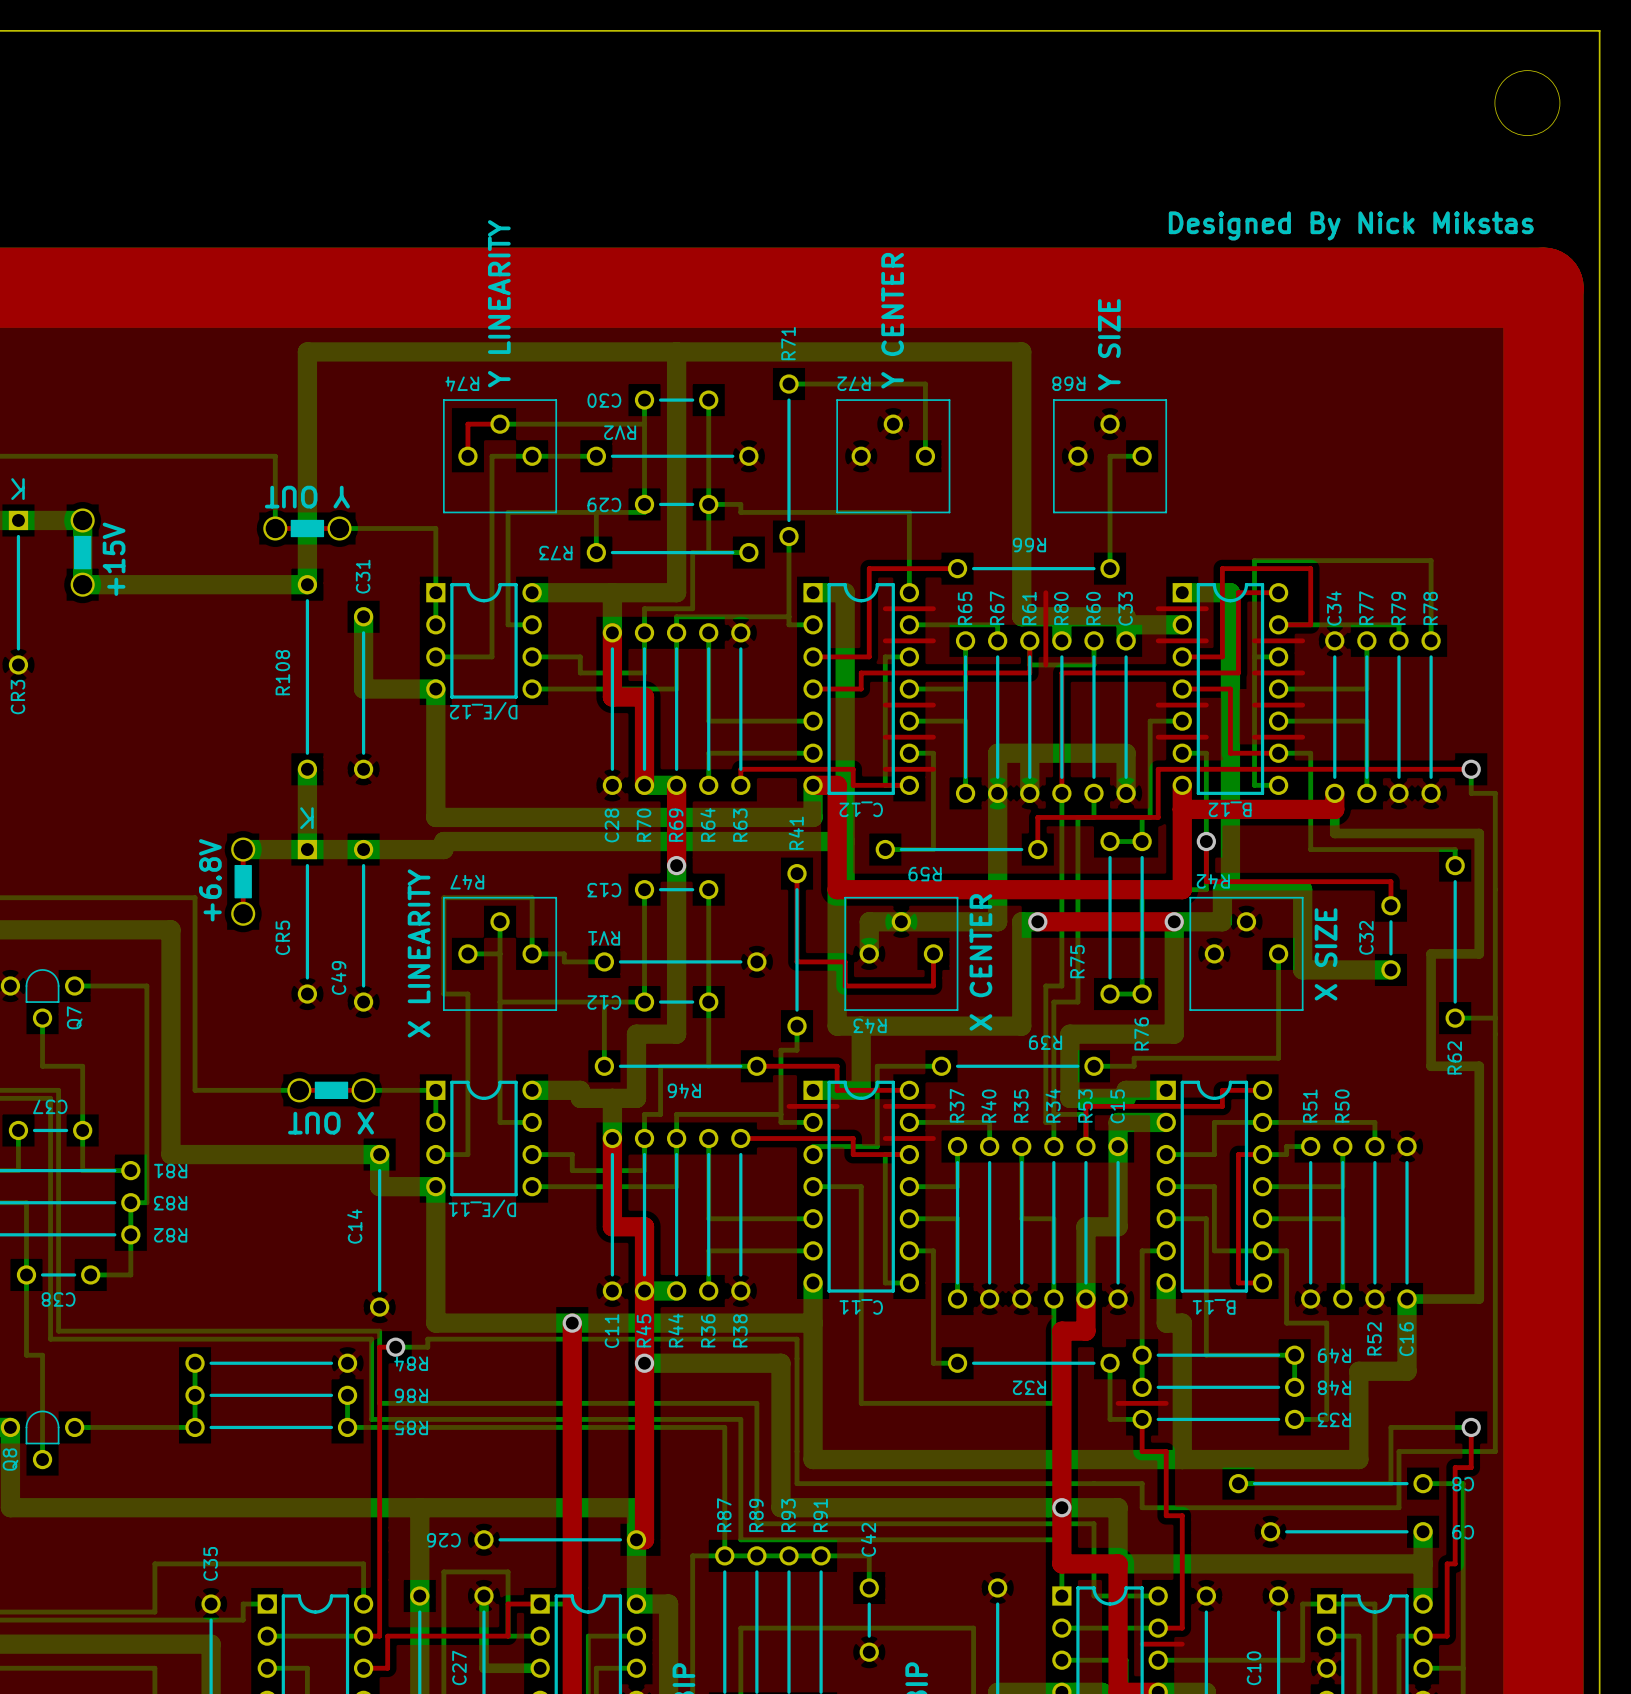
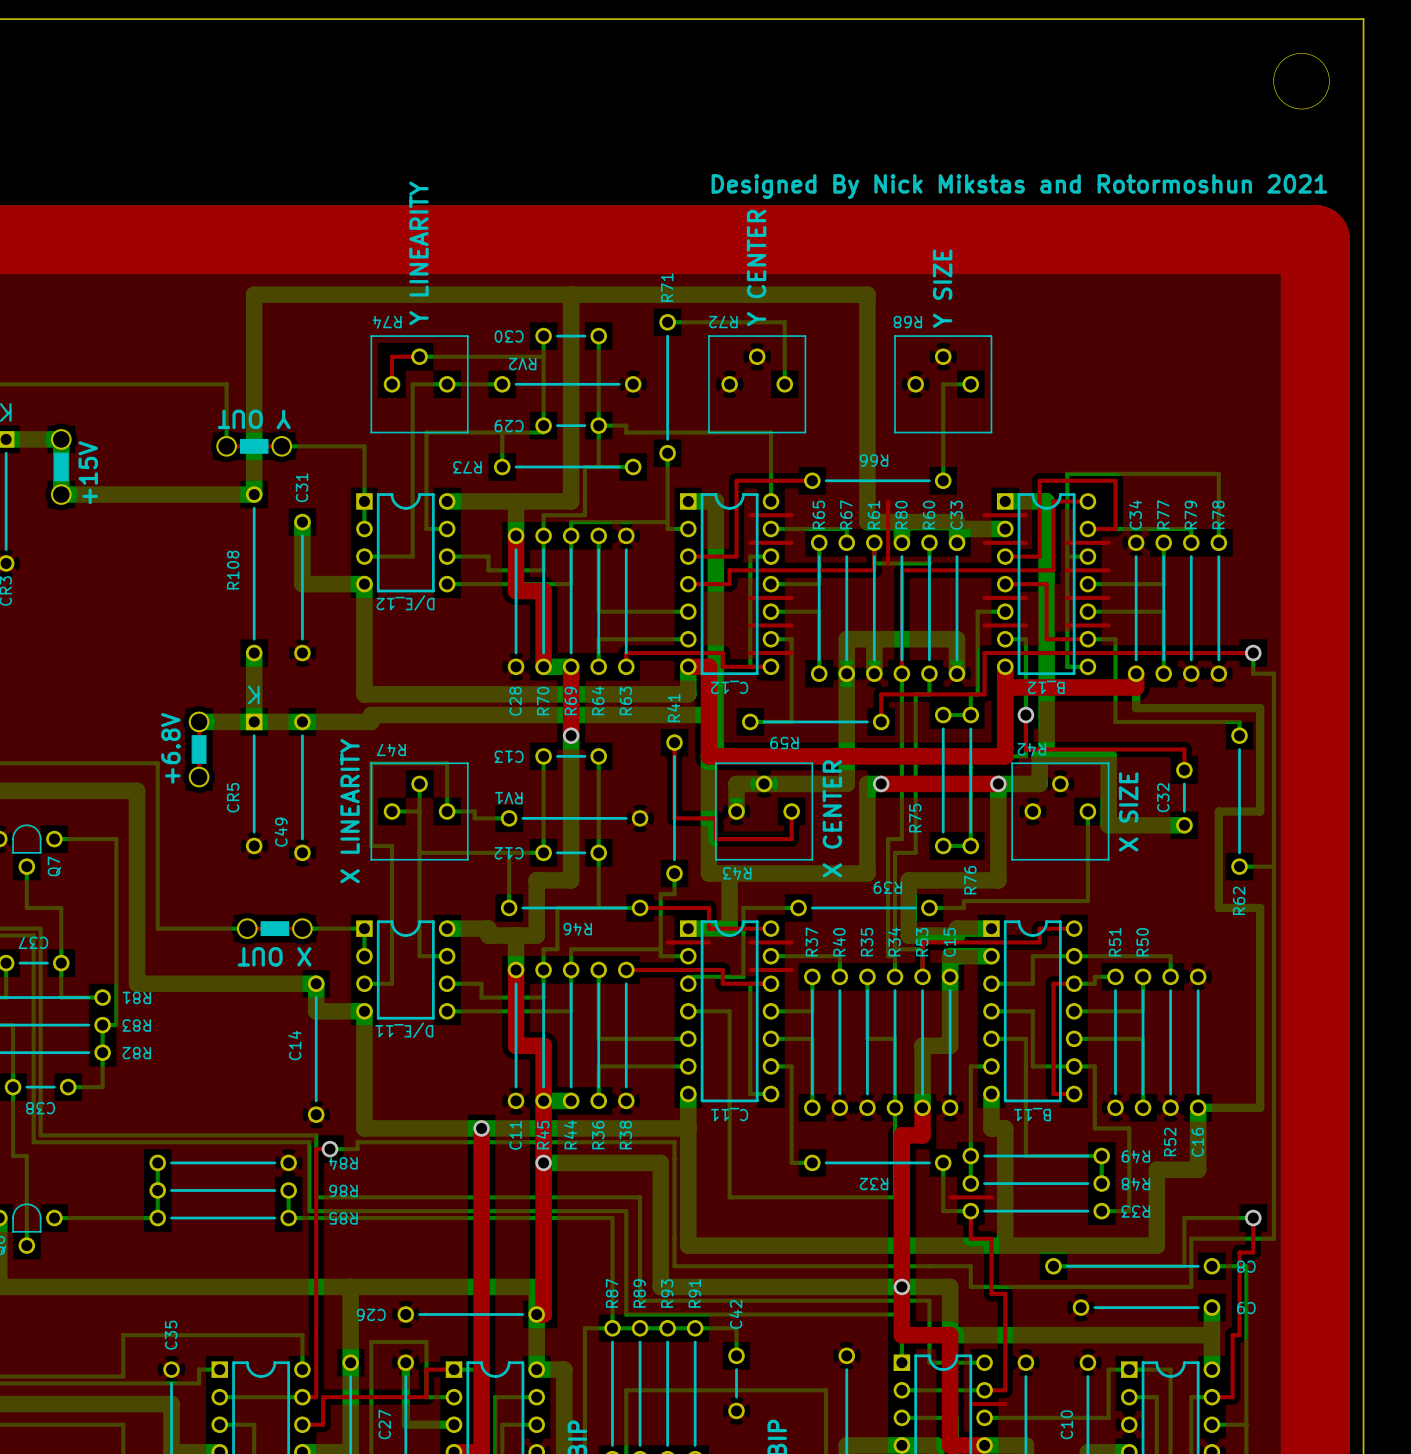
text: none -> Designed By Nick Mikstas and Rotormoshun 2021 (1019, 186)
text: Designed By Nick Mikstas (1351, 225) -> none

